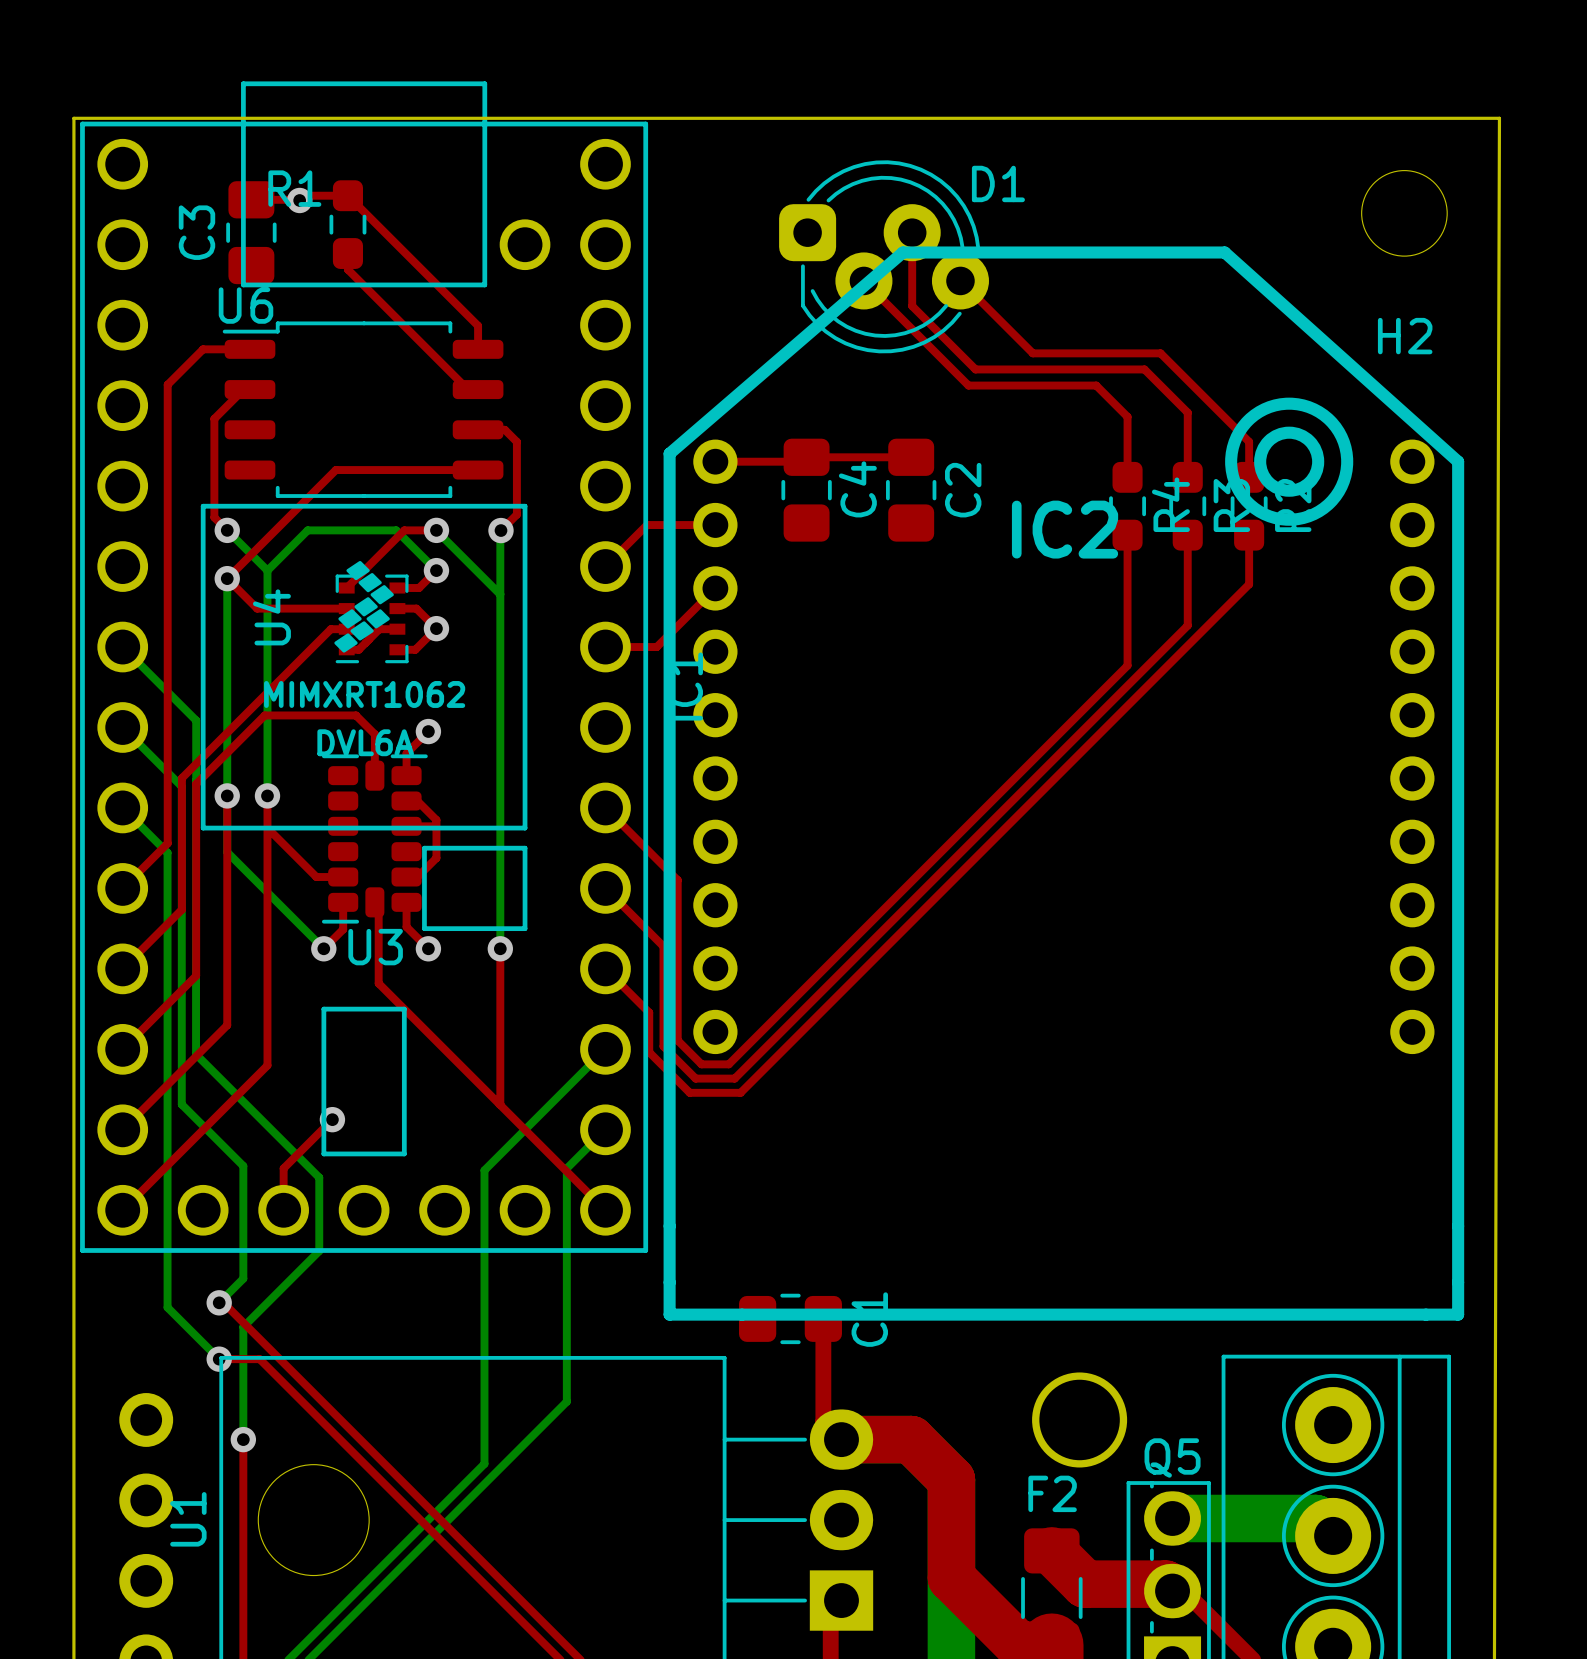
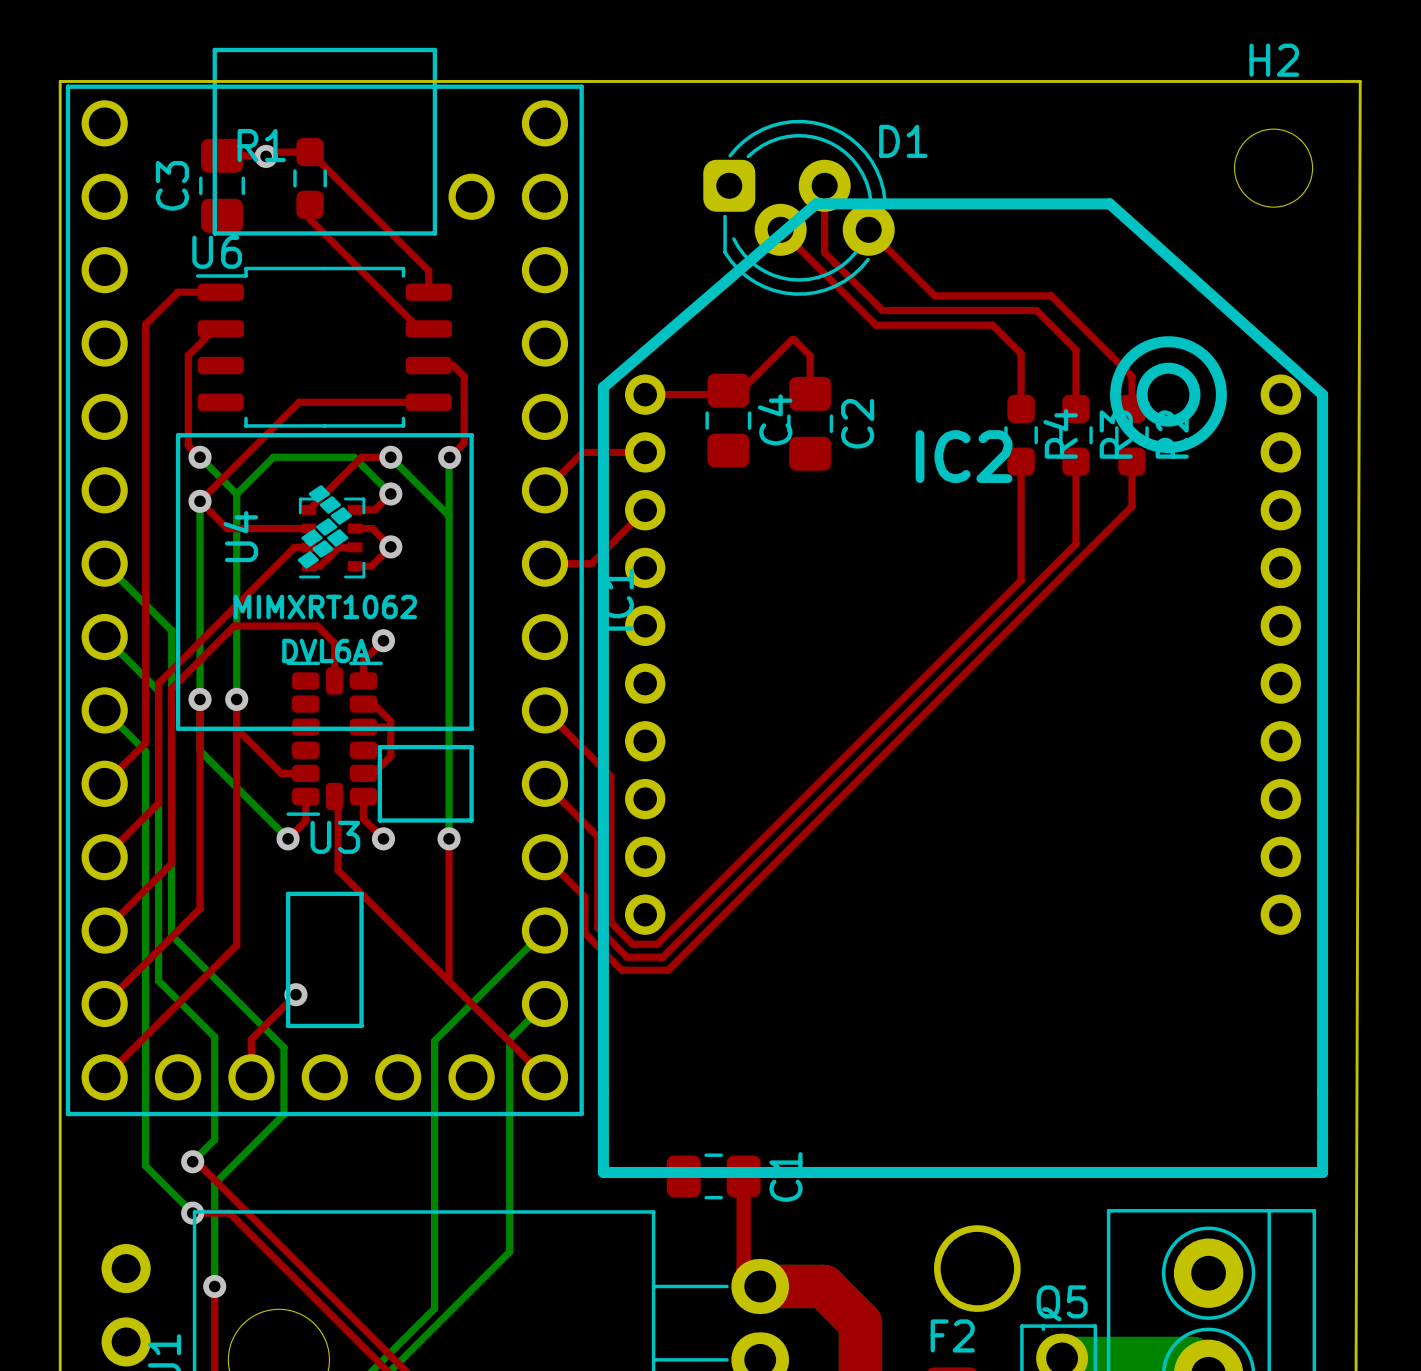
H2 name position: H2 (1405, 336) -> H2 (1274, 60)
top track: (911, 457) (806, 457) (802, 461) -> (810, 393) (810, 355) (794, 339) (791, 339) (737, 394) (724, 394)
C2 position: (911, 490) -> (810, 423)

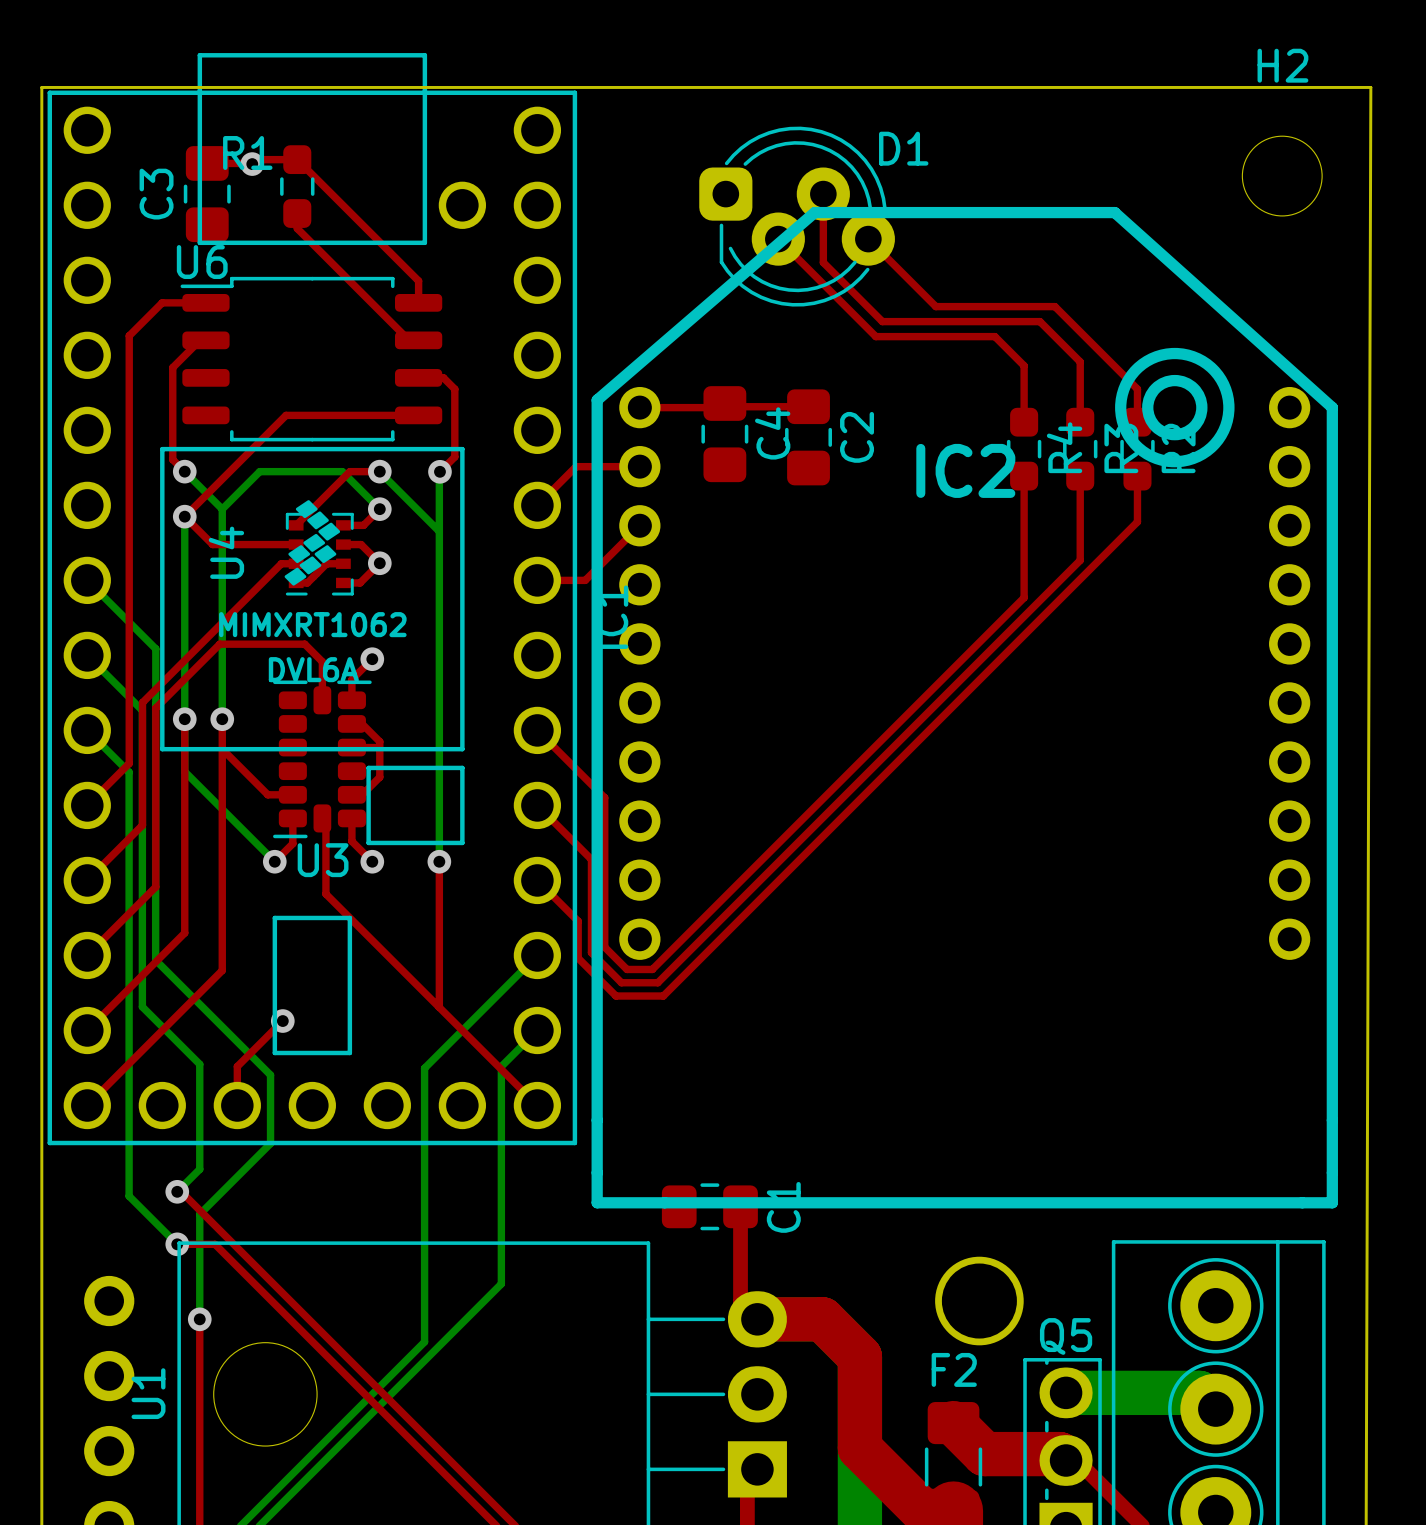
top track: (737, 393) (791, 339) (794, 339) (810, 355) (810, 393) -> (717, 406) (808, 406)

